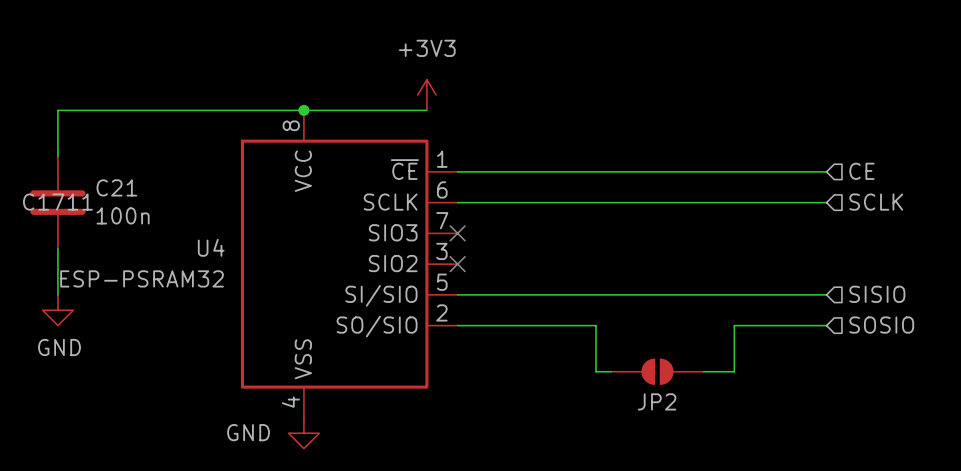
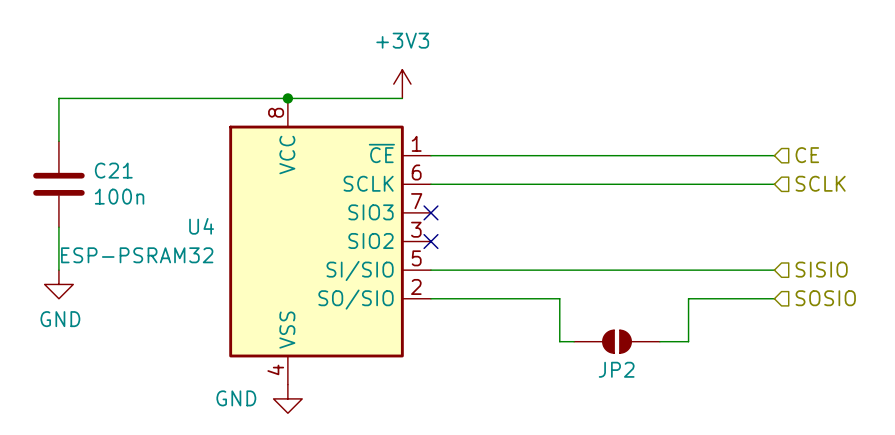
C21 text: C1711 (57, 202) -> none

